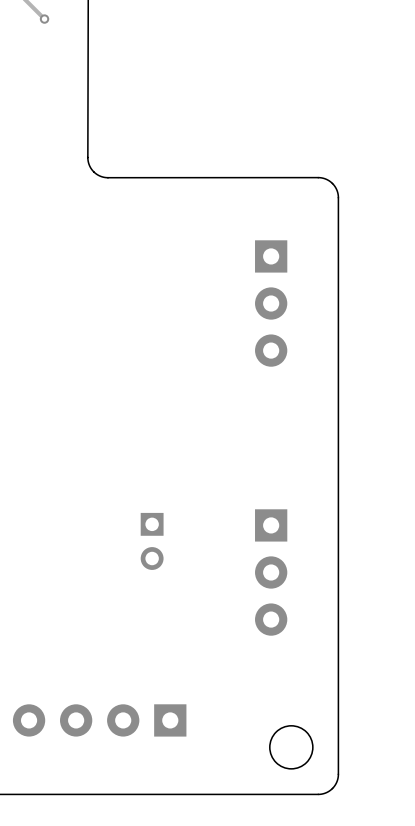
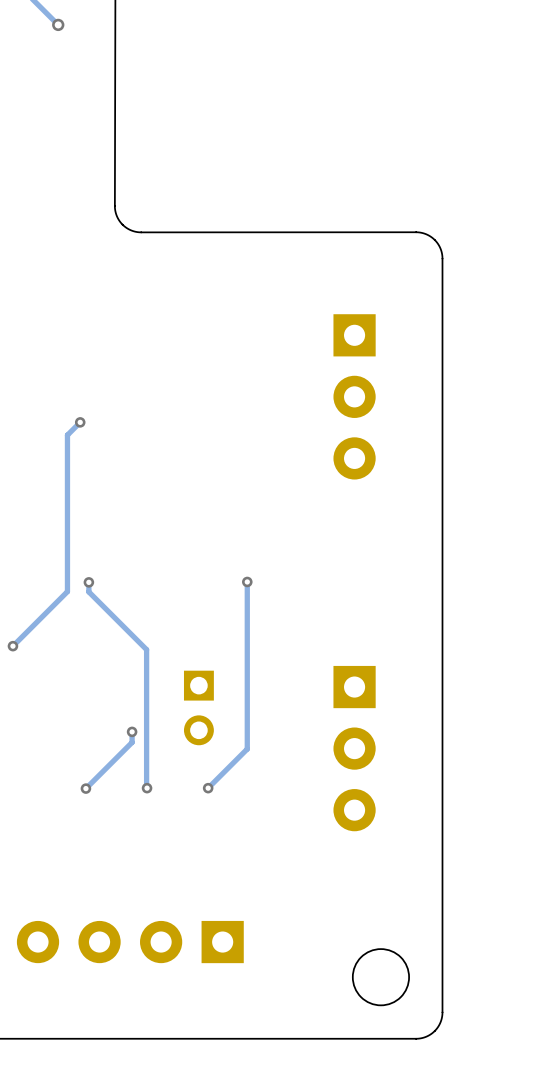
track: none -> (80, 422) (67, 435) (67, 591) (12, 646)
via: none -> (80, 422)
track: none -> (88, 582) (88, 591) (146, 649) (147, 788)
via: none -> (88, 582)
track: none -> (247, 581) (247, 749) (208, 788)
via: none -> (247, 581)
via: none -> (12, 646)
track: none -> (132, 731) (132, 742) (85, 788)
via: none -> (132, 731)
via: none -> (147, 788)
via: none -> (208, 788)
via: none -> (85, 788)

